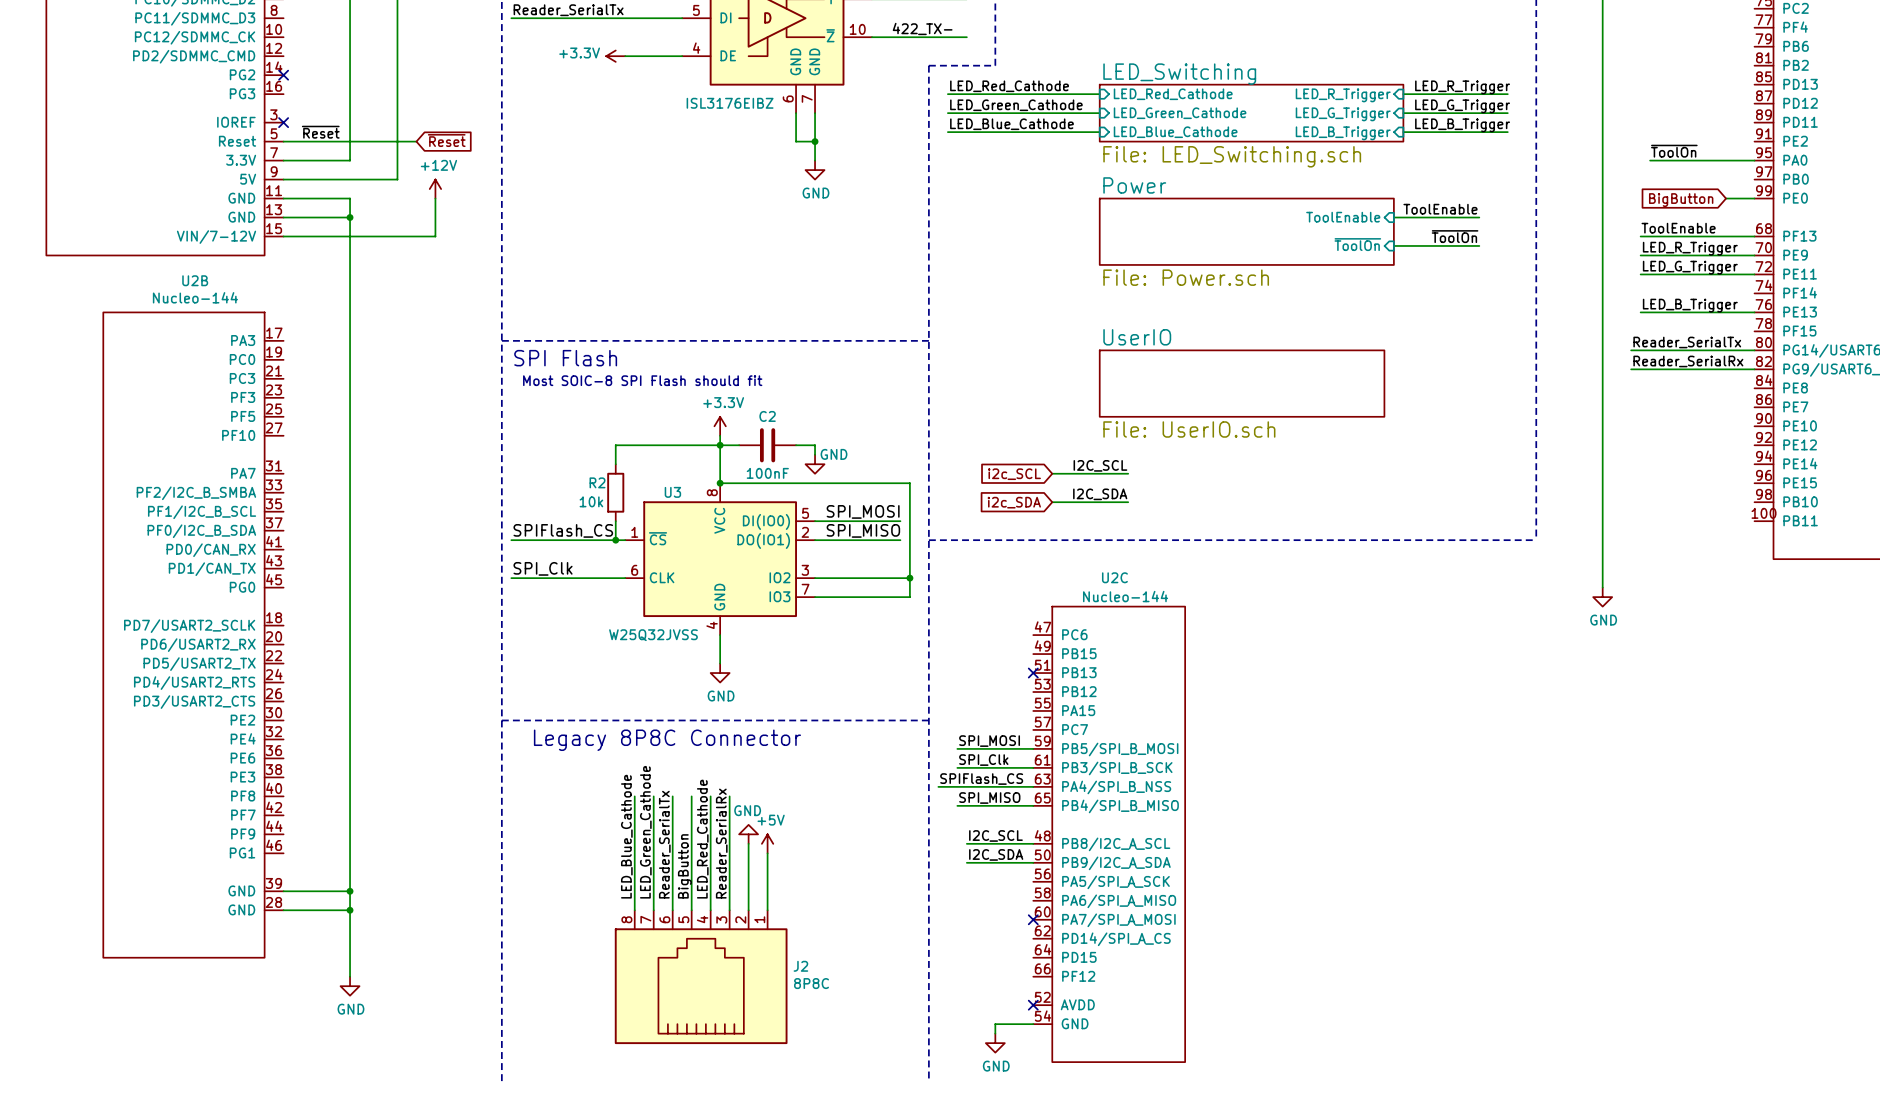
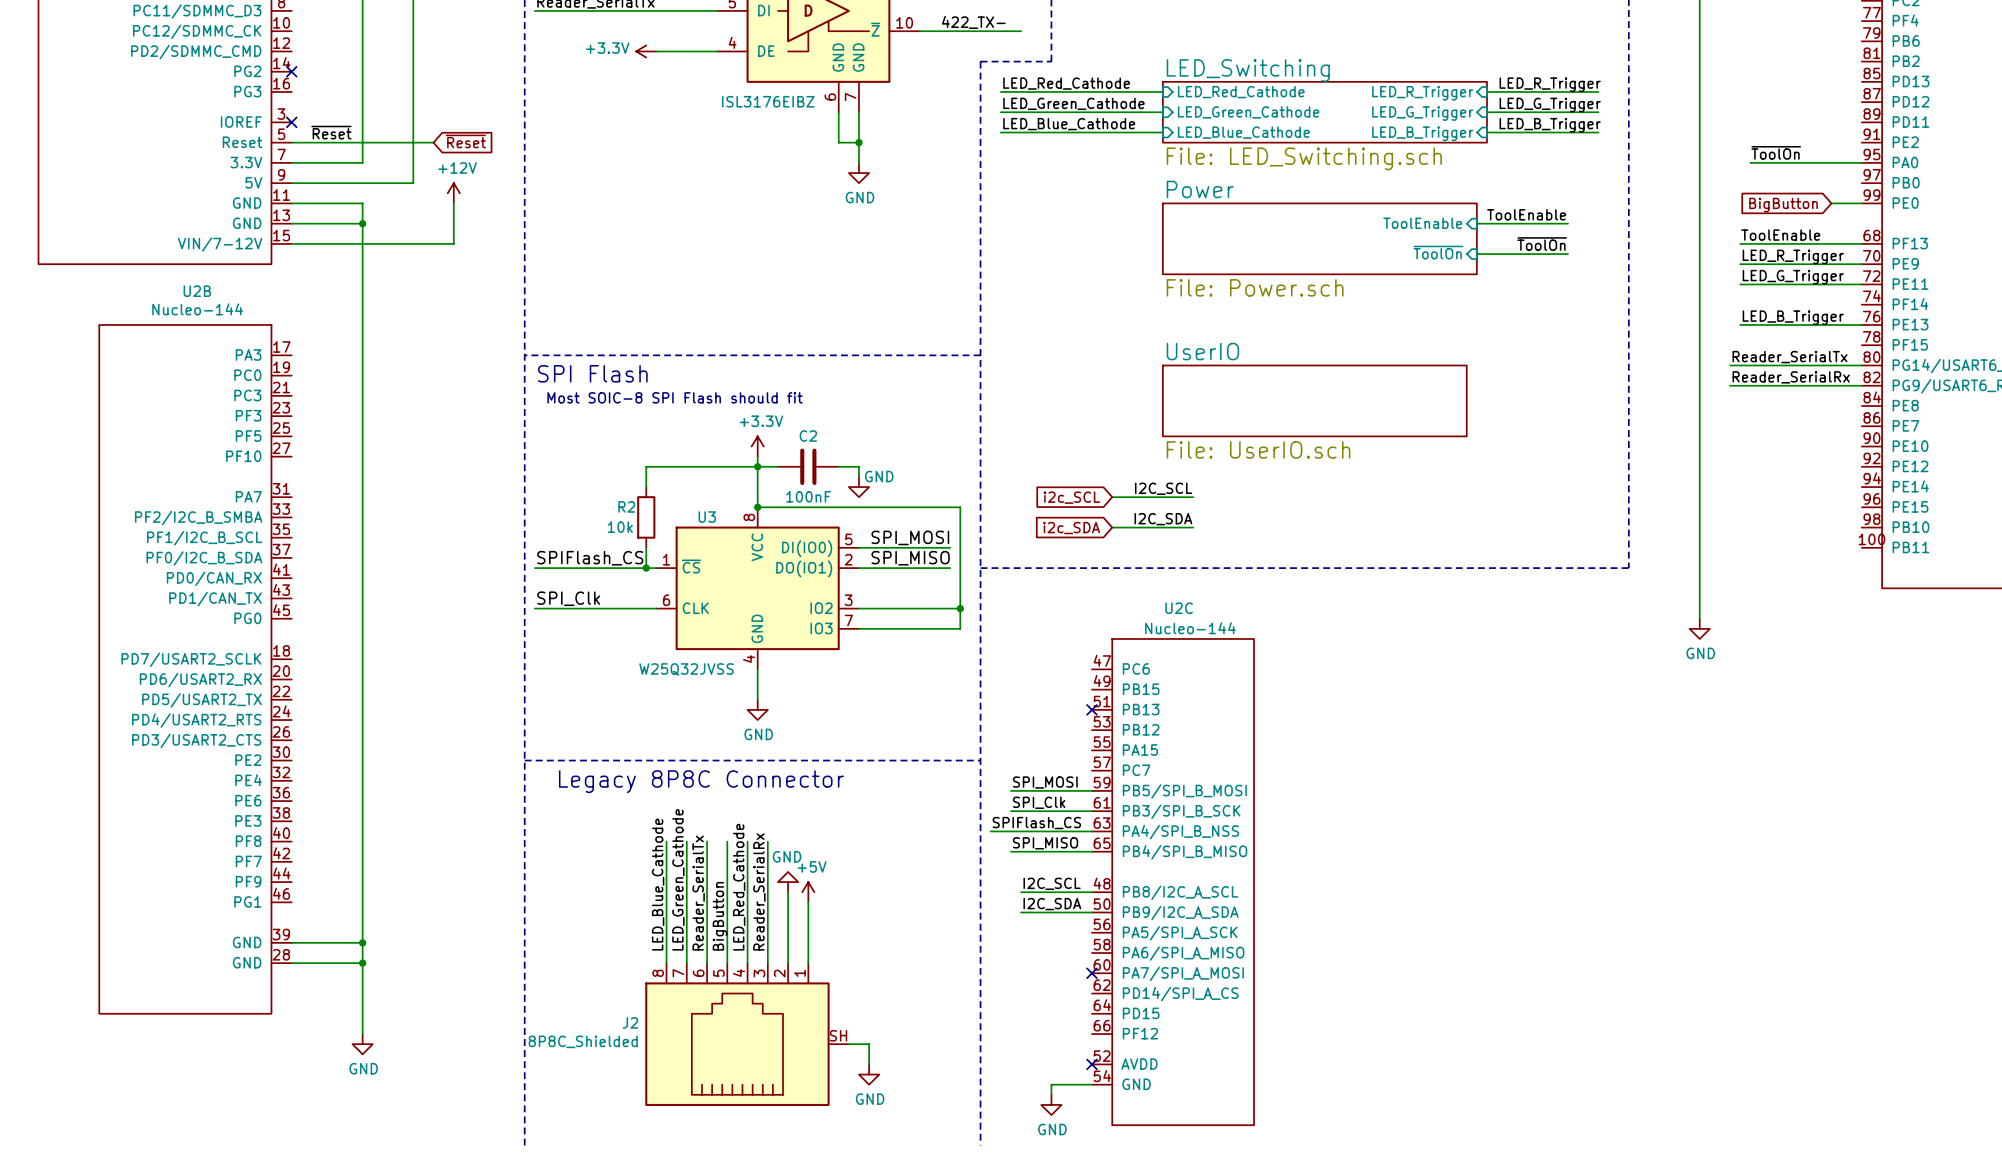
J2 symbol: [614, 910, 788, 1045] -> [645, 963, 849, 1106]
J2 name position: J2 (800, 966) -> J2 (630, 1022)
J2 value: 8P8C (811, 983) -> 8P8C_Shielded (583, 1041)
wire: none -> (848, 1044) (869, 1044) (869, 1064)
power symbol: none -> GND (869, 1074)

